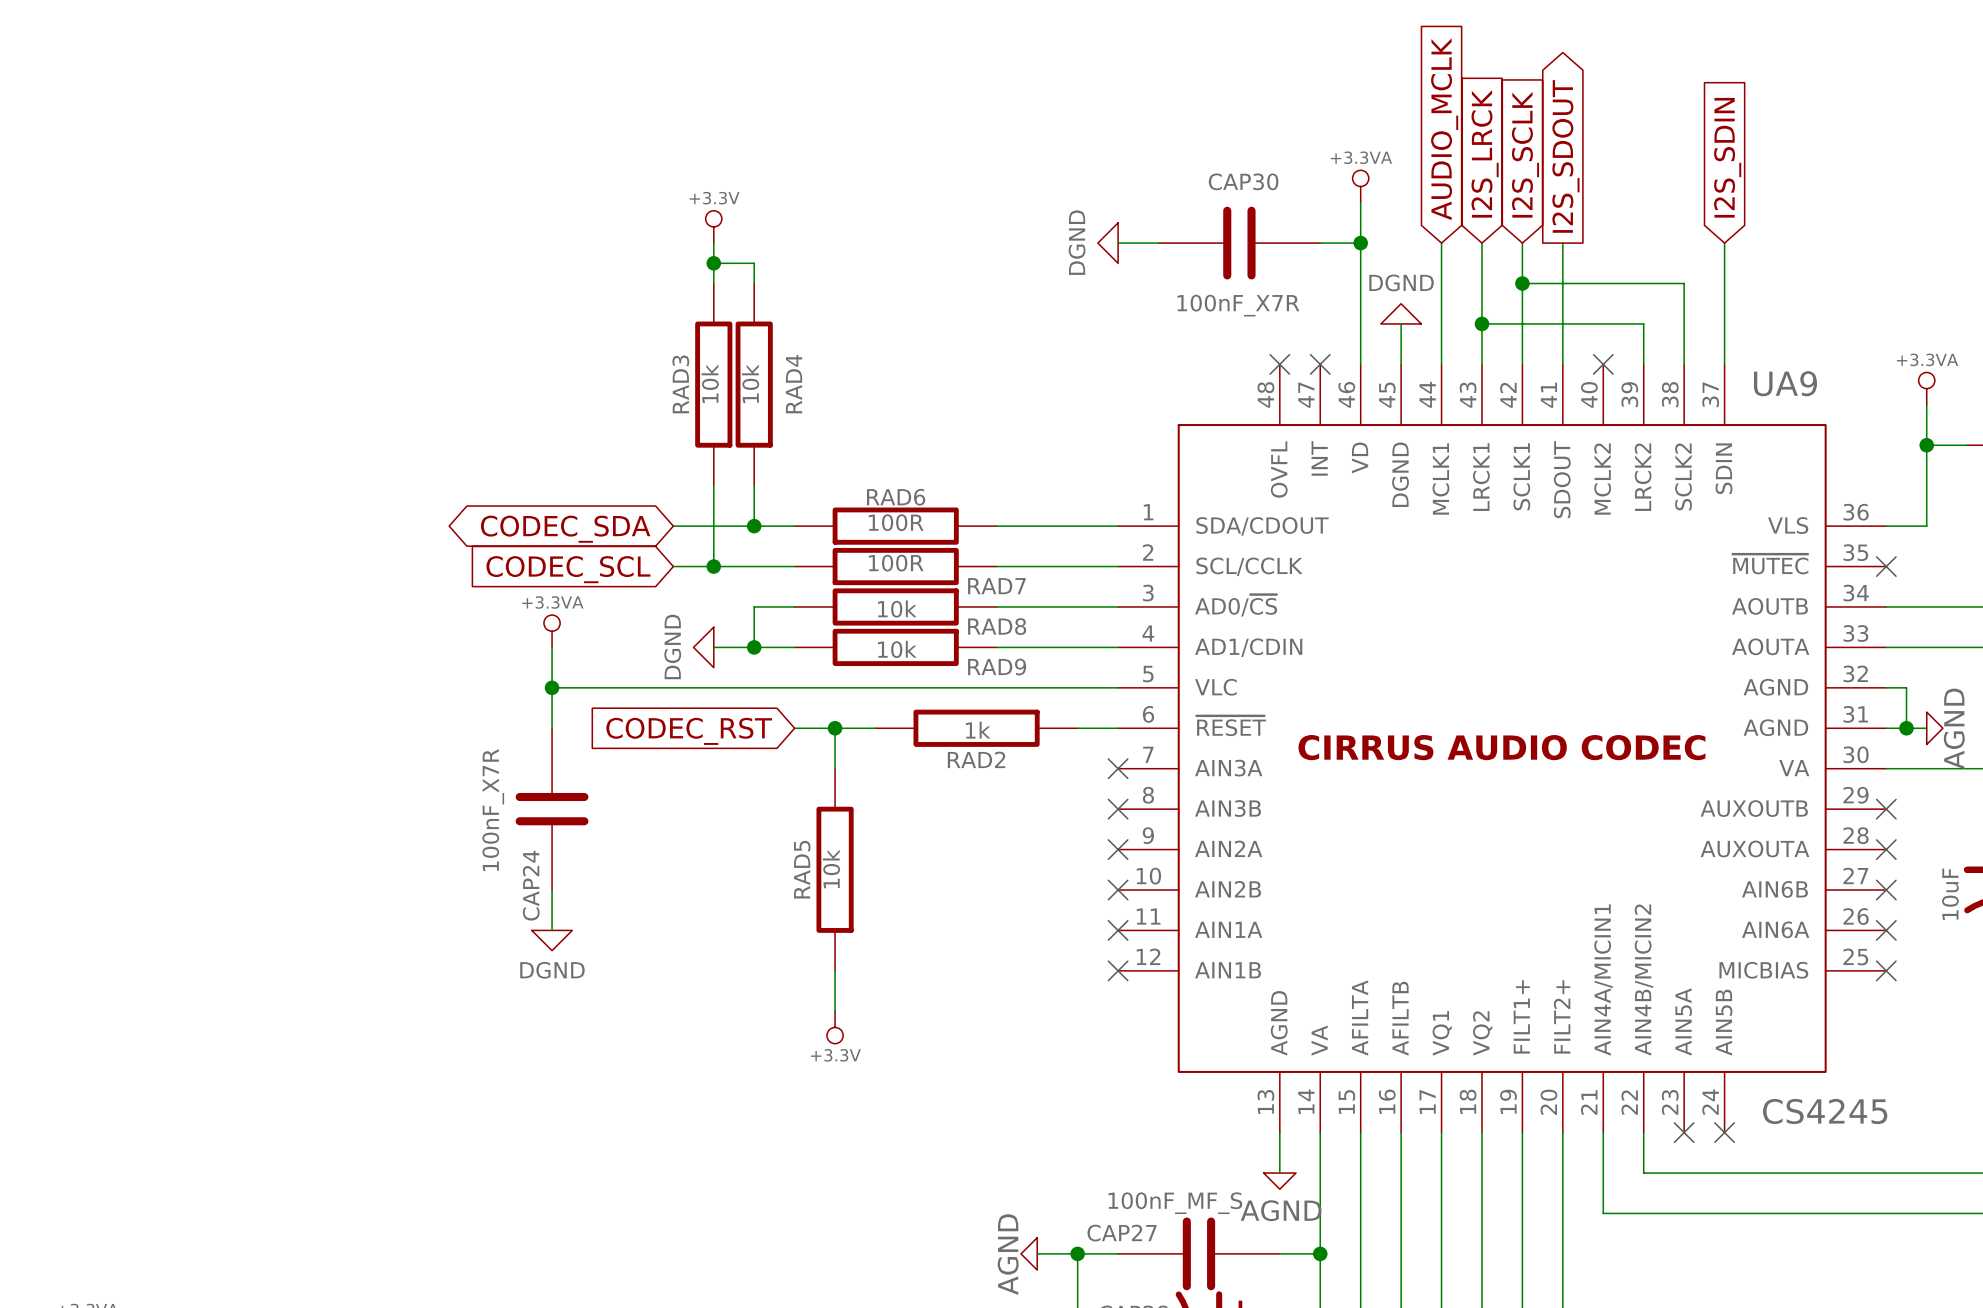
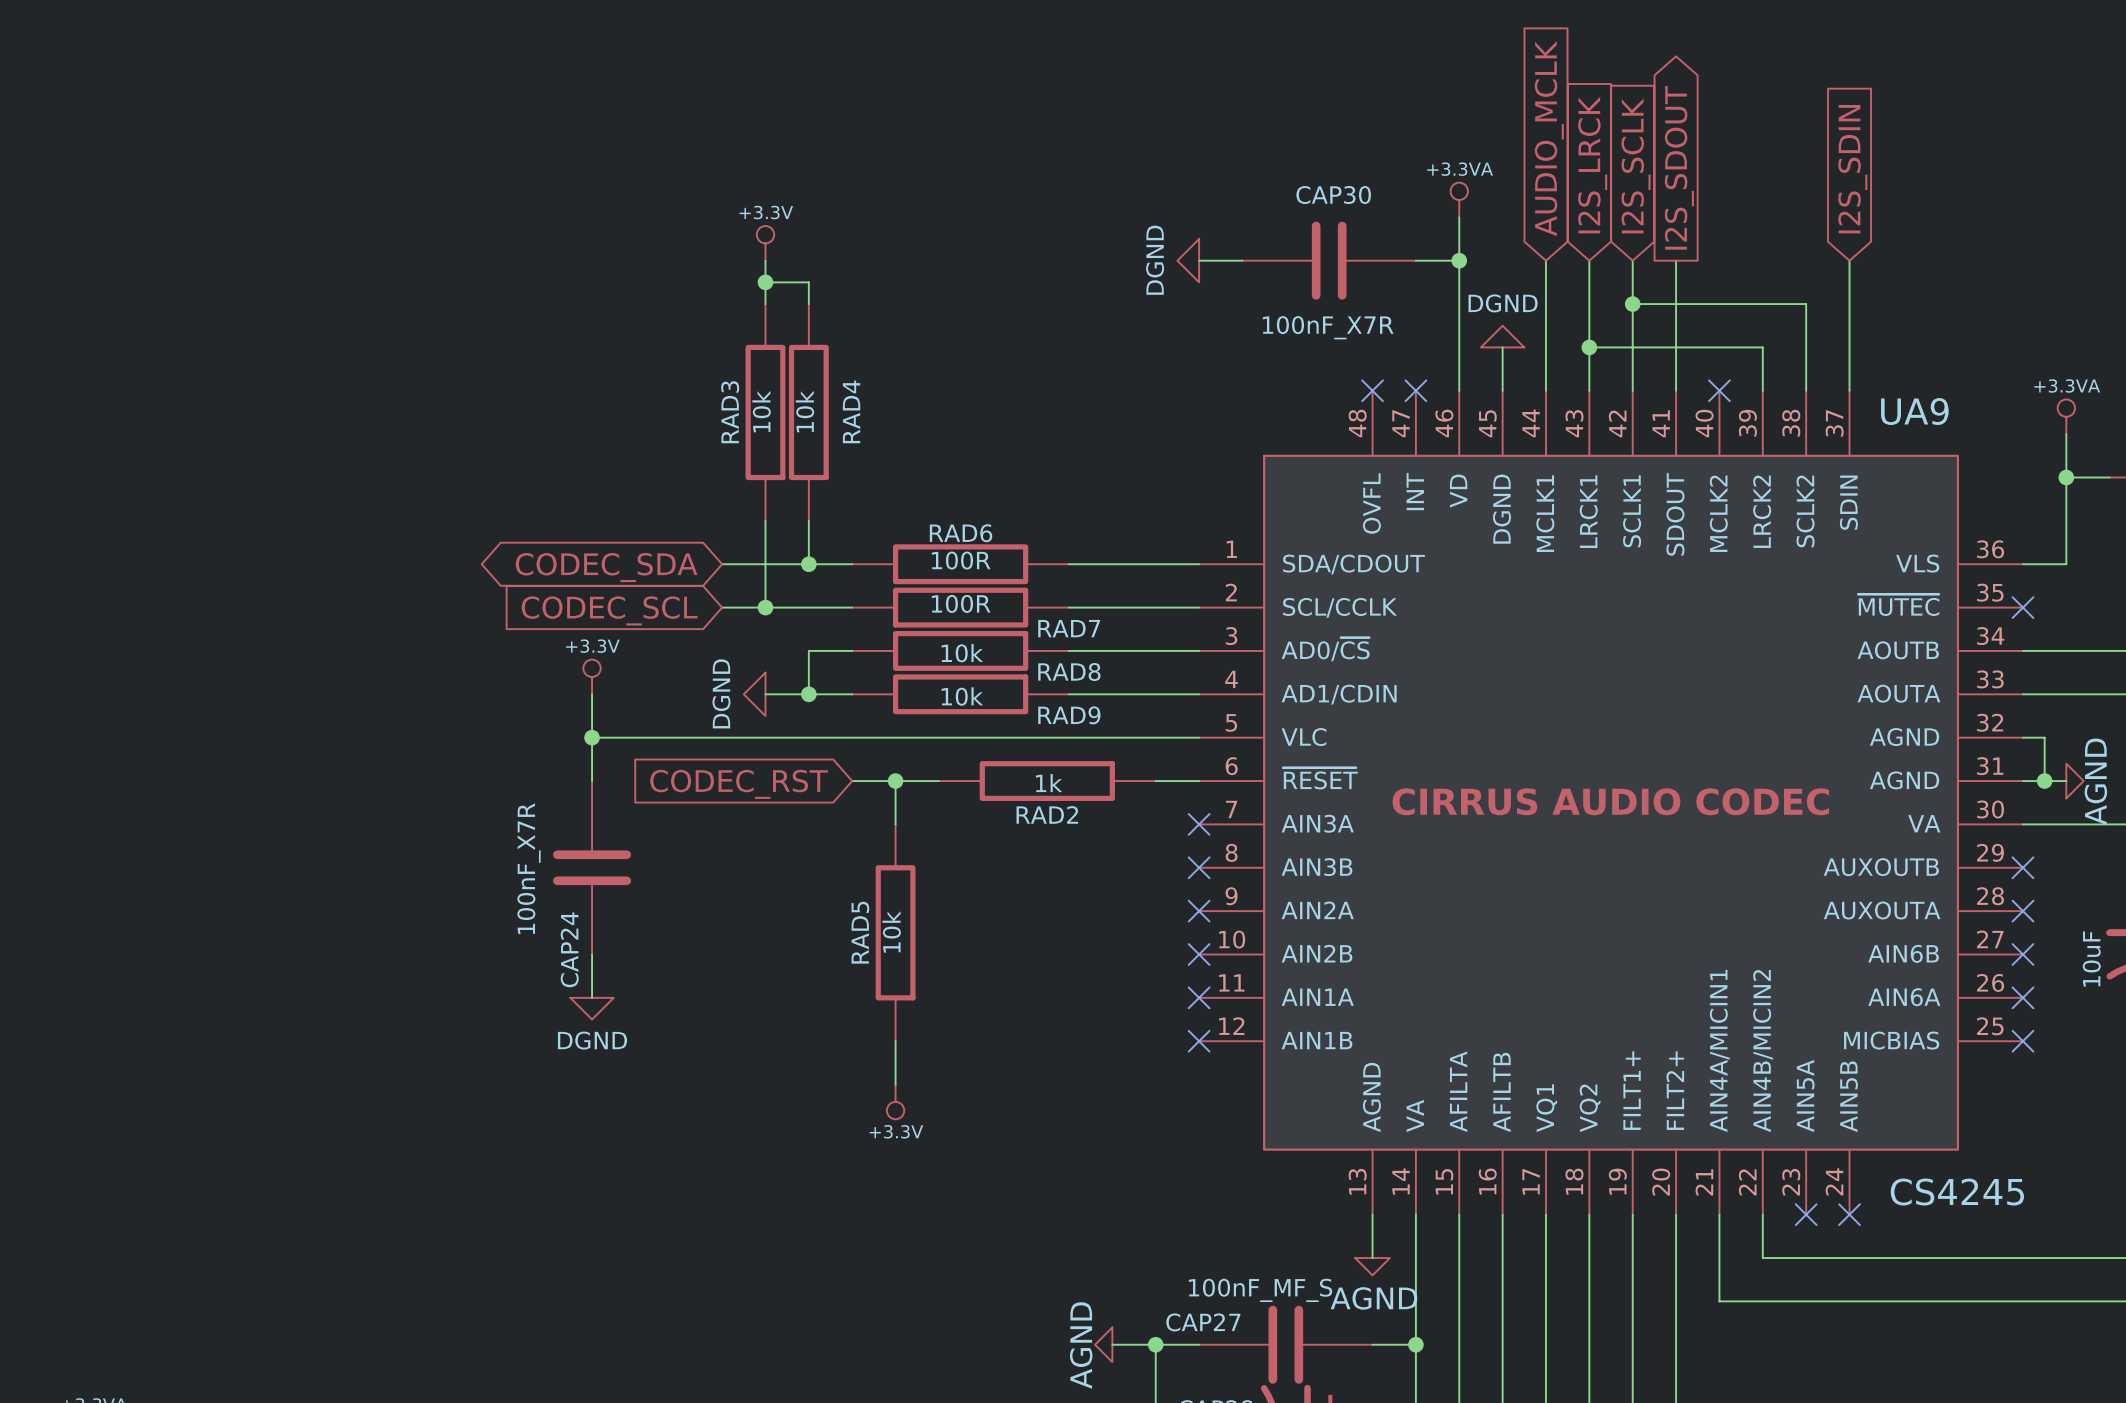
power symbol: +3.3VA (552, 631) -> +3.3V (592, 676)

